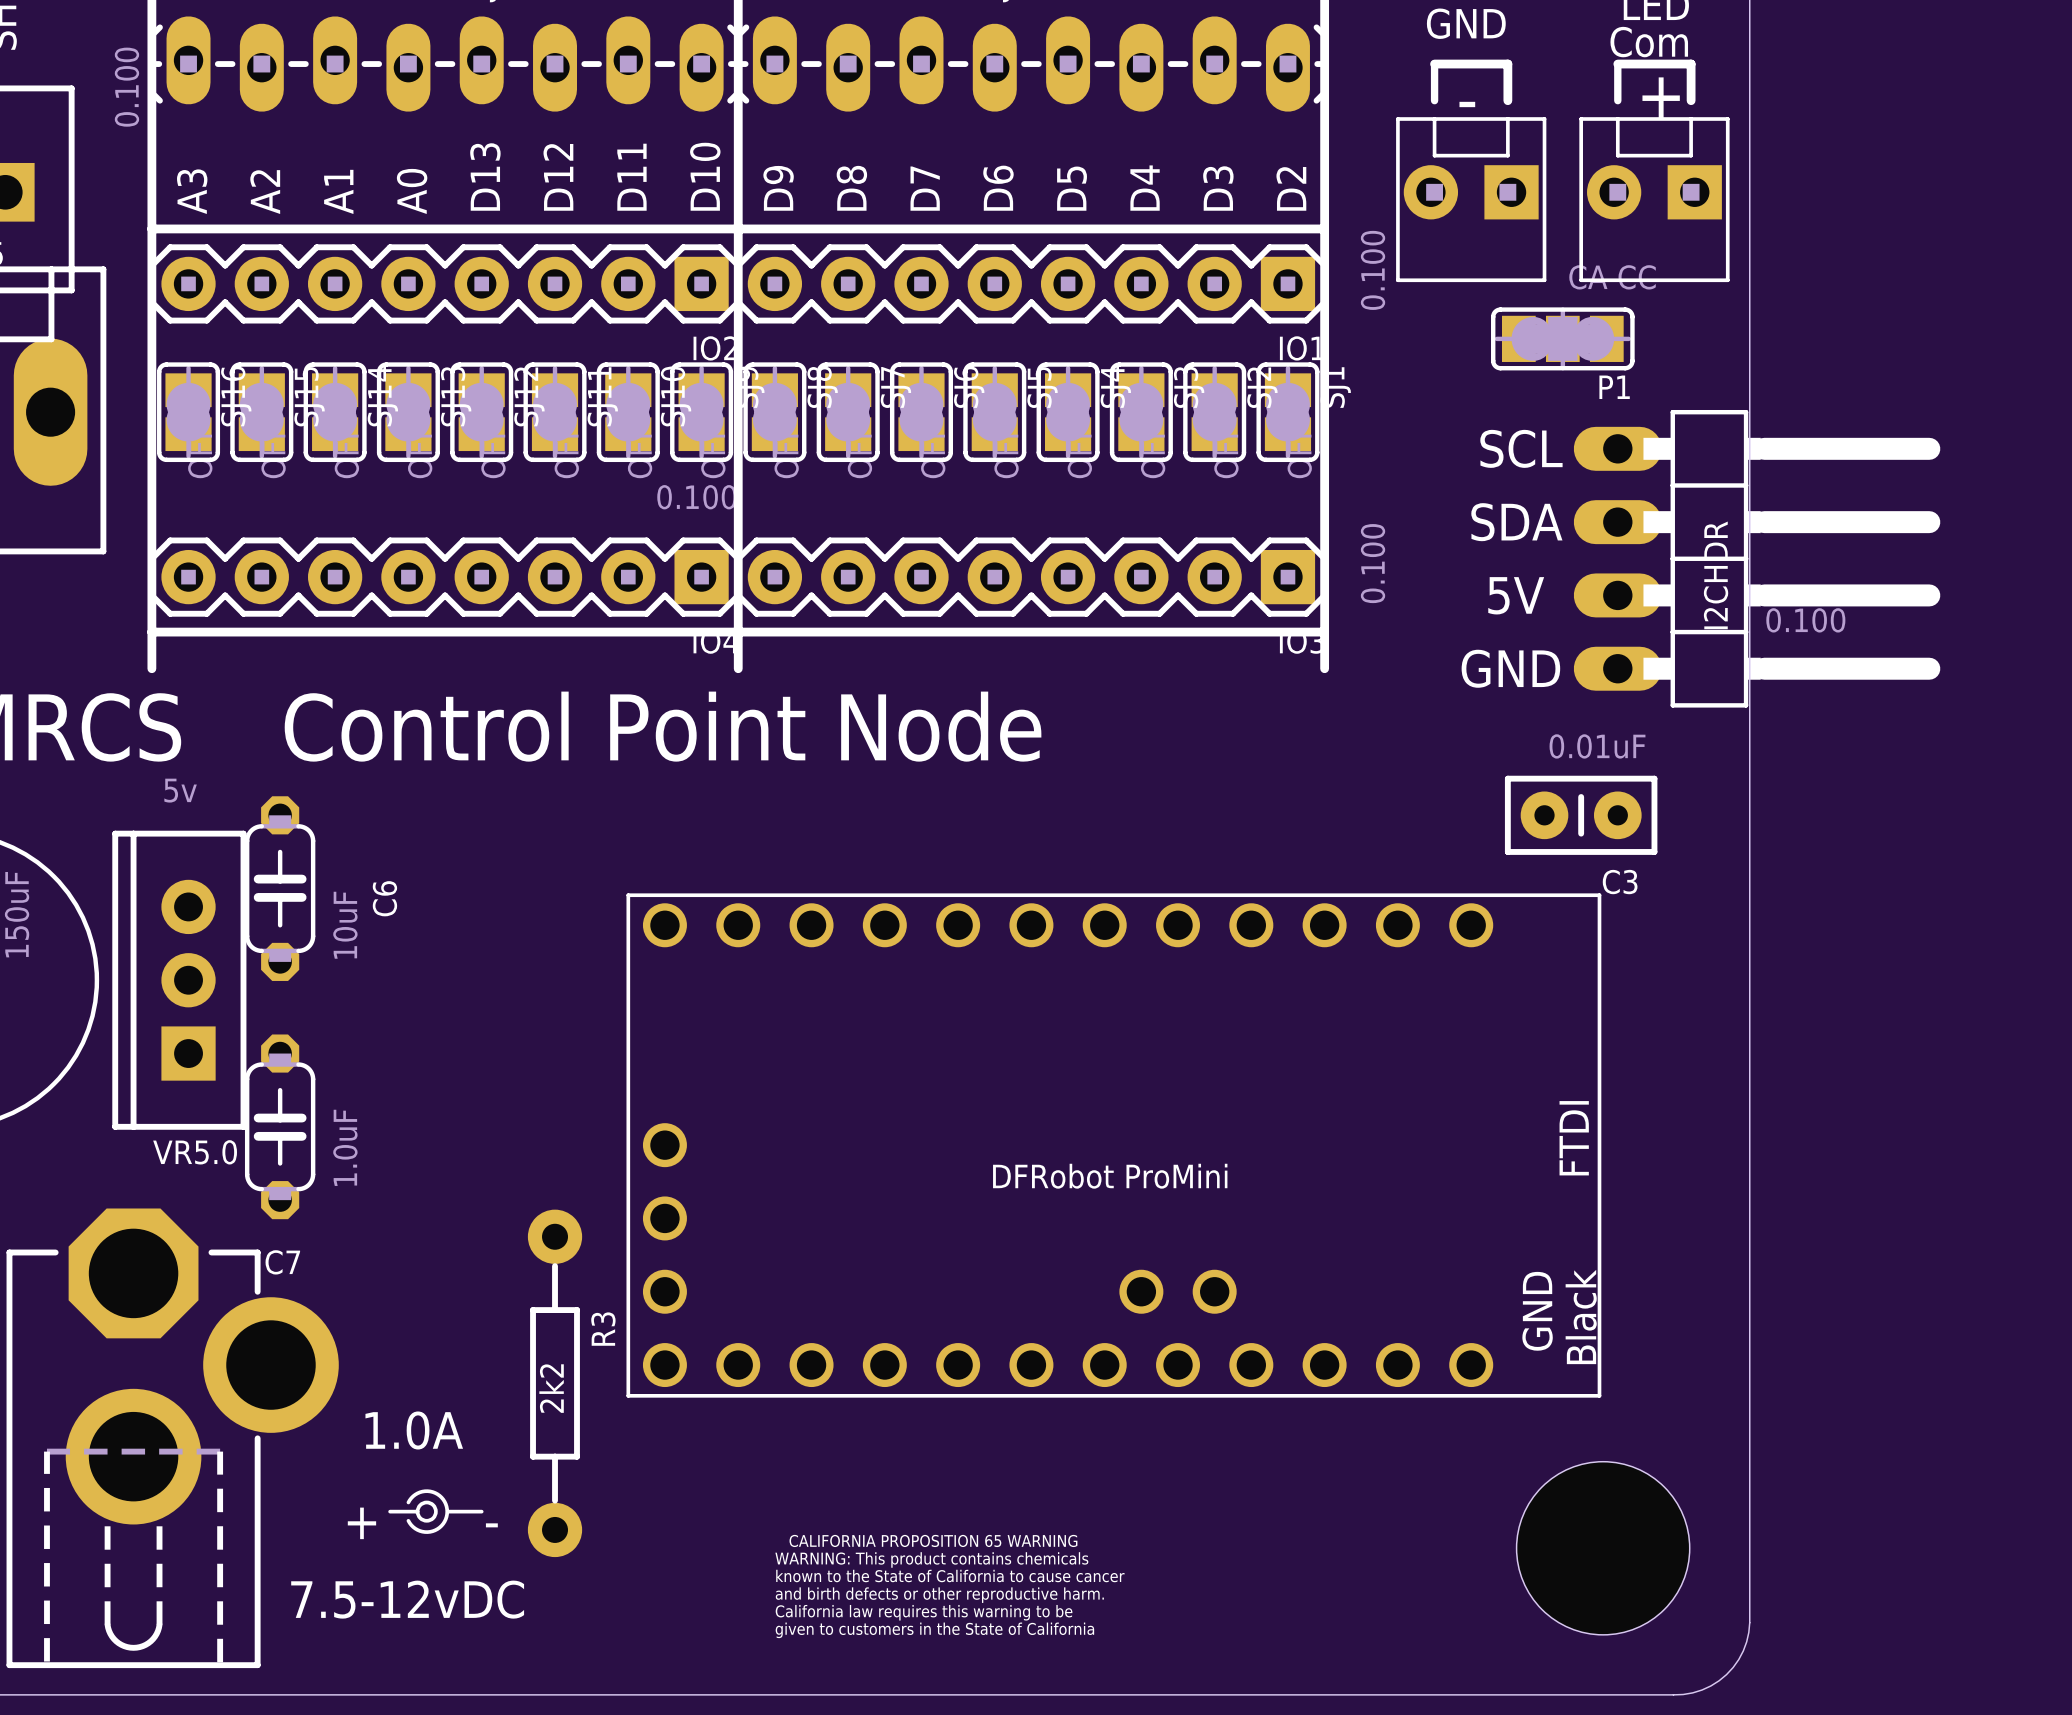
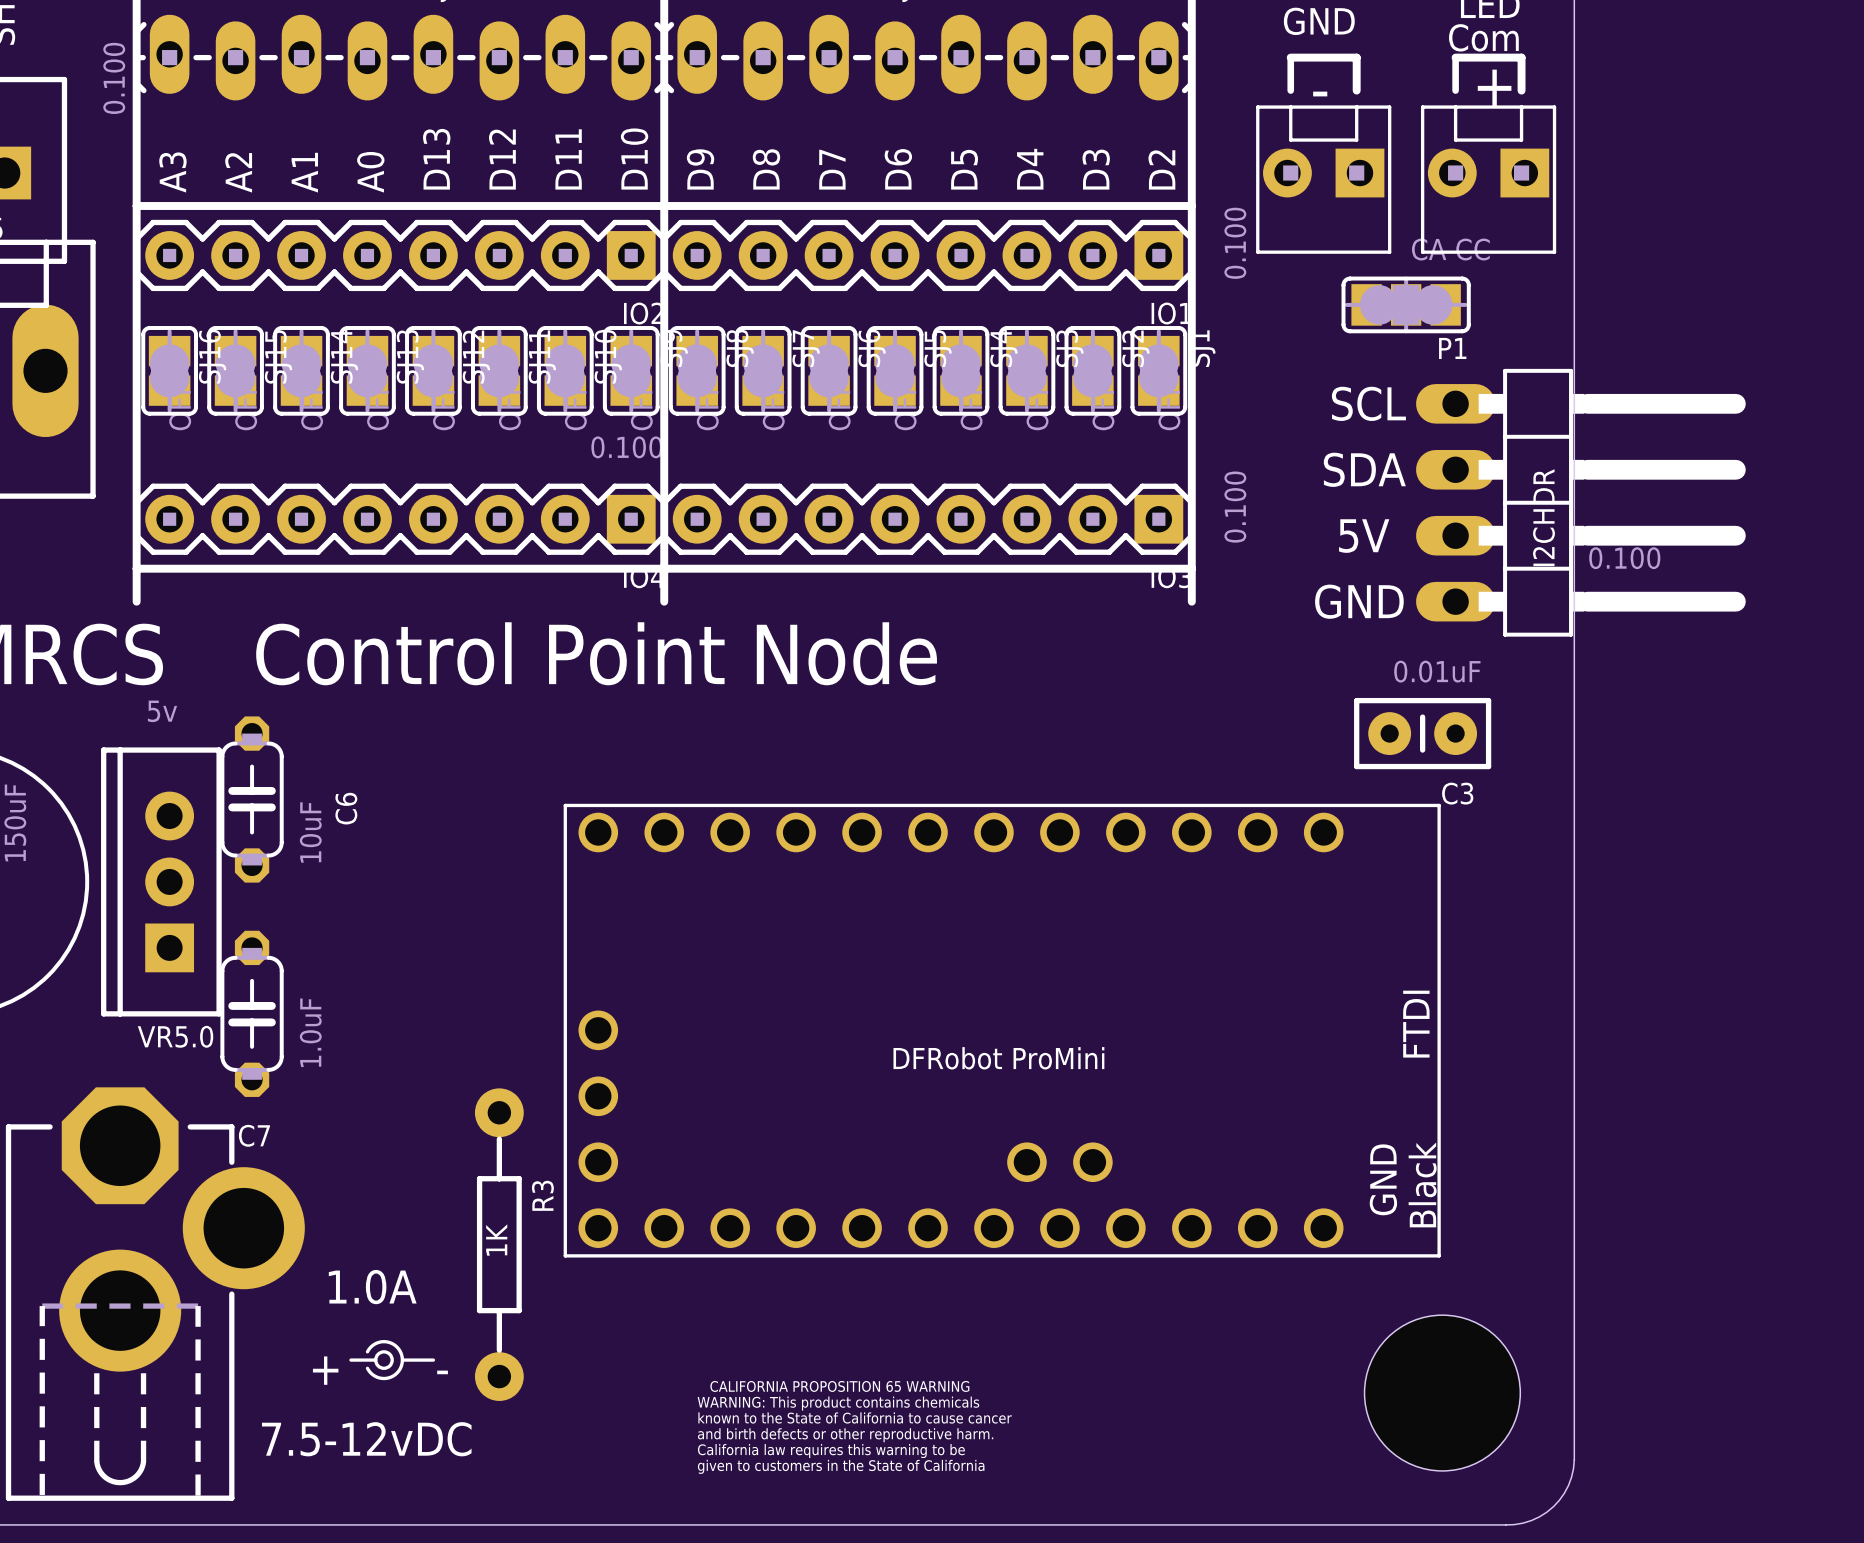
R3 value: 2k2 (551, 1388) -> 1K (496, 1240)

